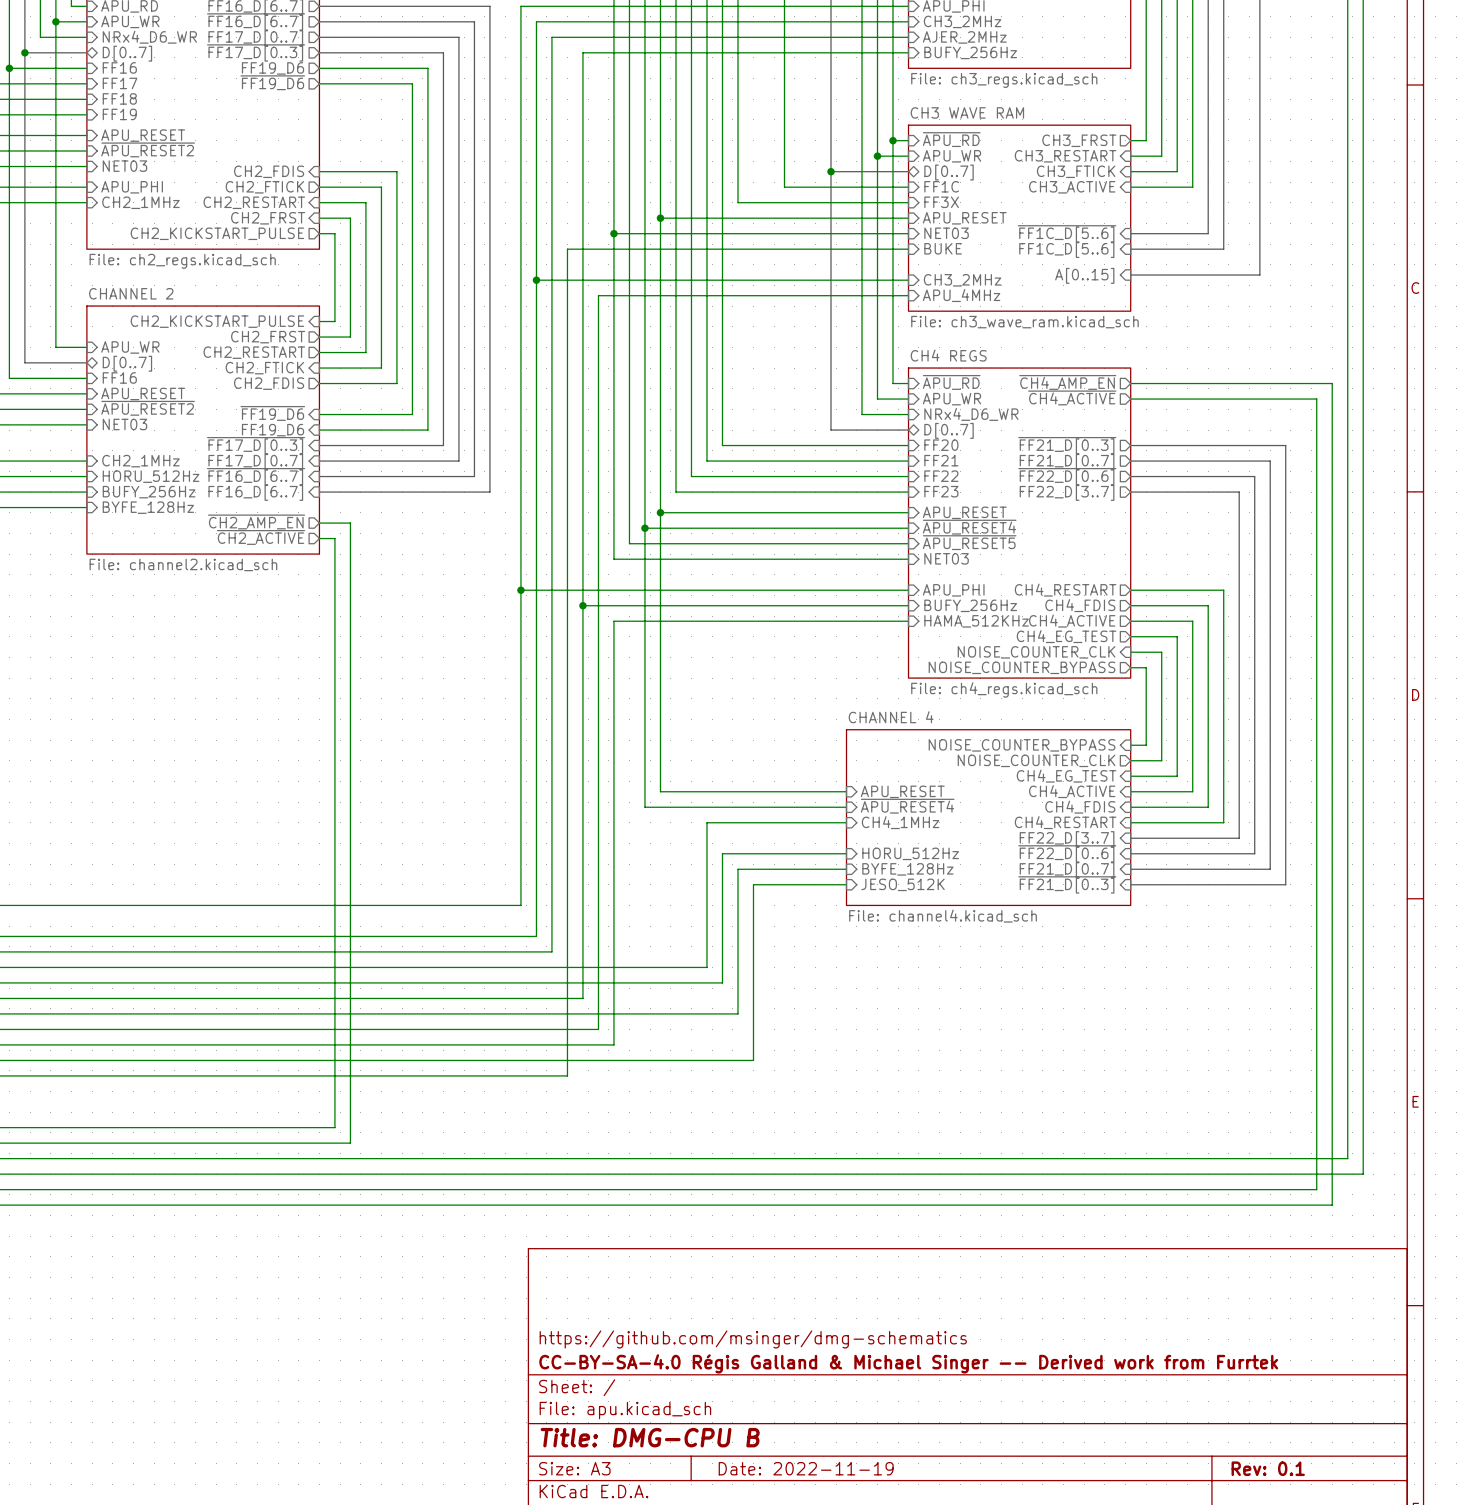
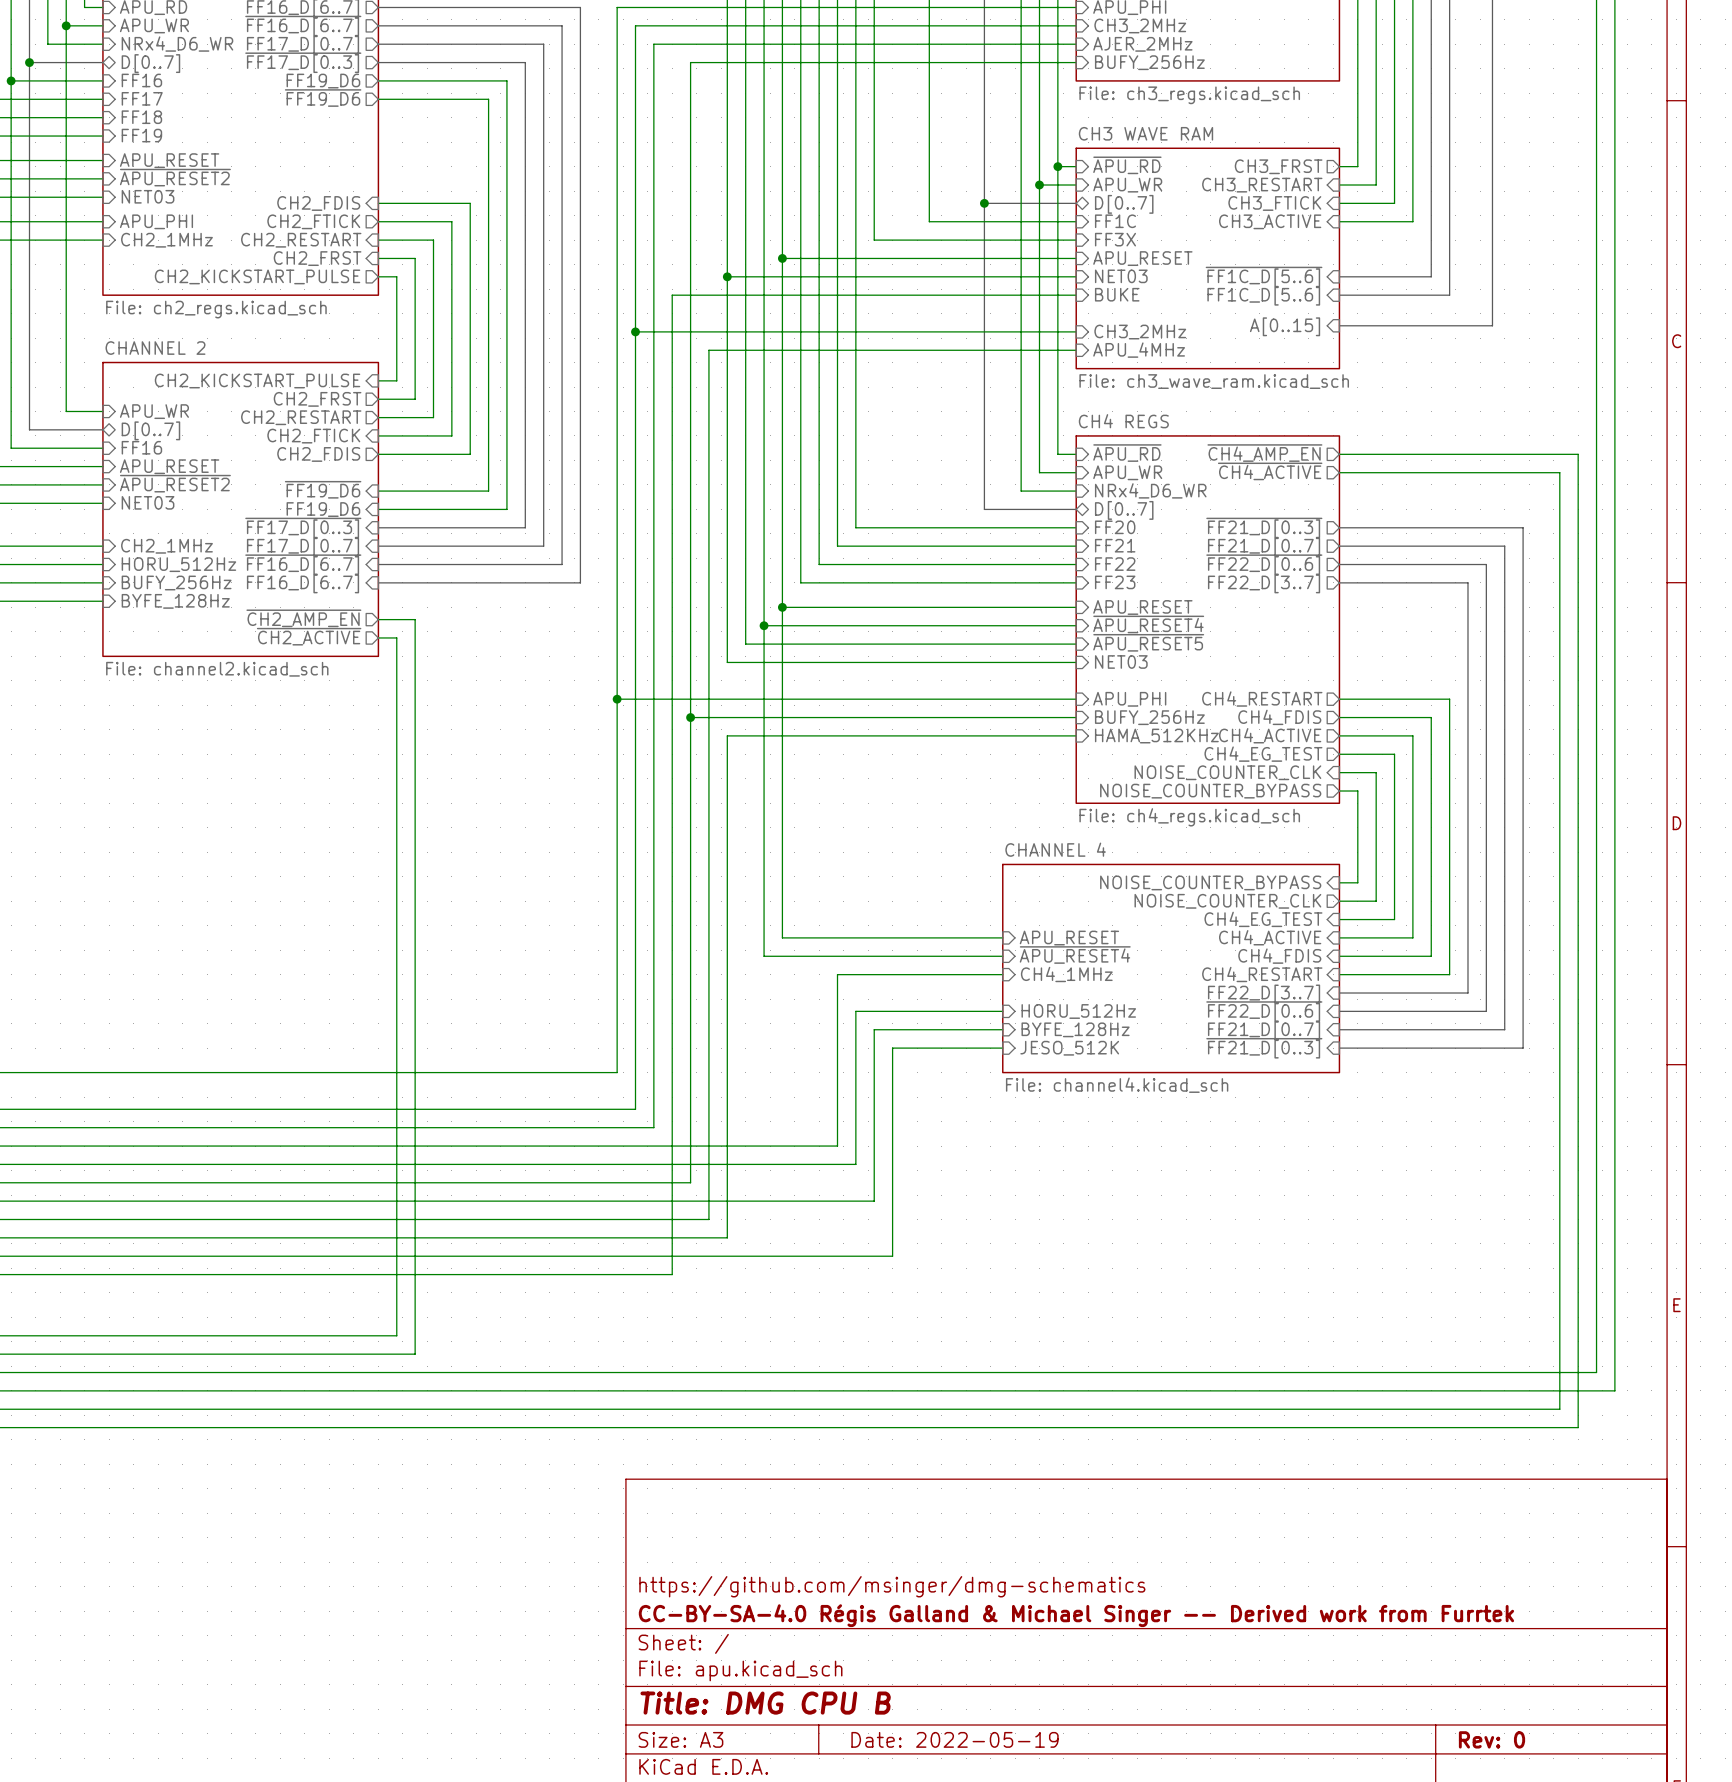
title block: Title: DMG-CPU B (650, 1437) -> Title: DMG CPU B (765, 1703)
title block: Date: 2022-11-19 (806, 1468) -> Date: 2022-05-19 (955, 1739)
title block: Rev: 0.1 (1268, 1468) -> Rev: 0 (1491, 1739)

